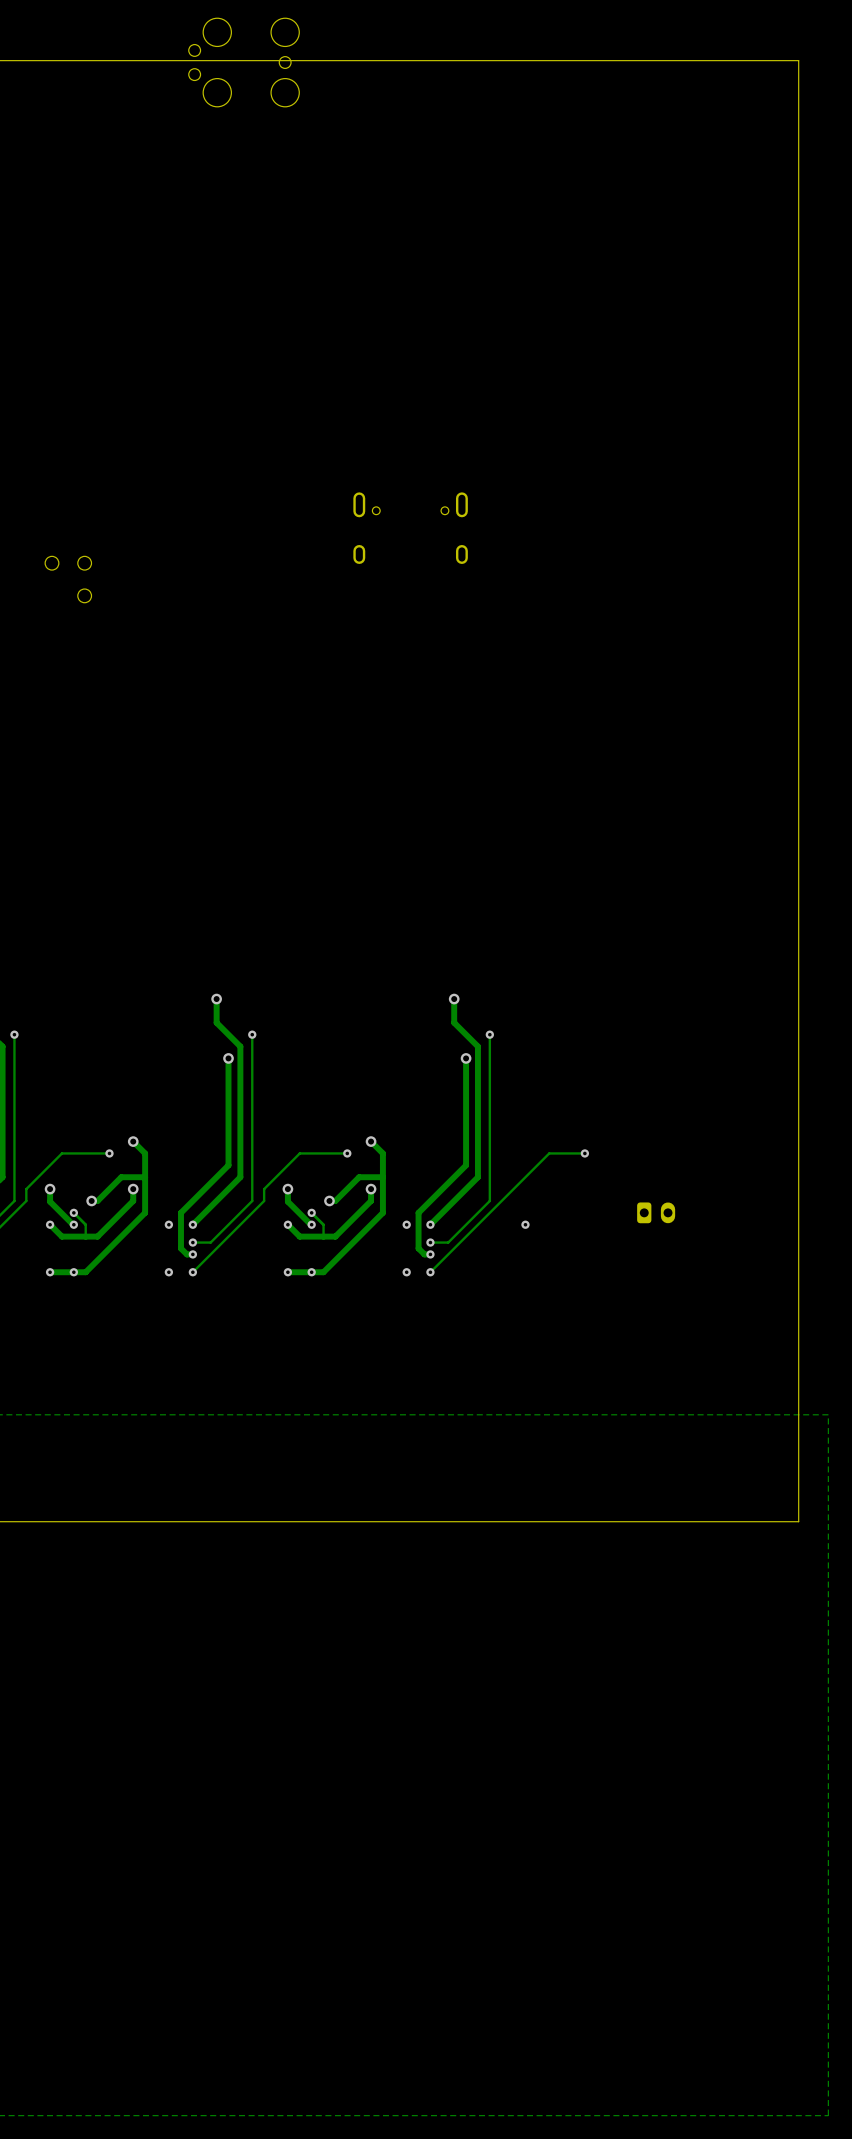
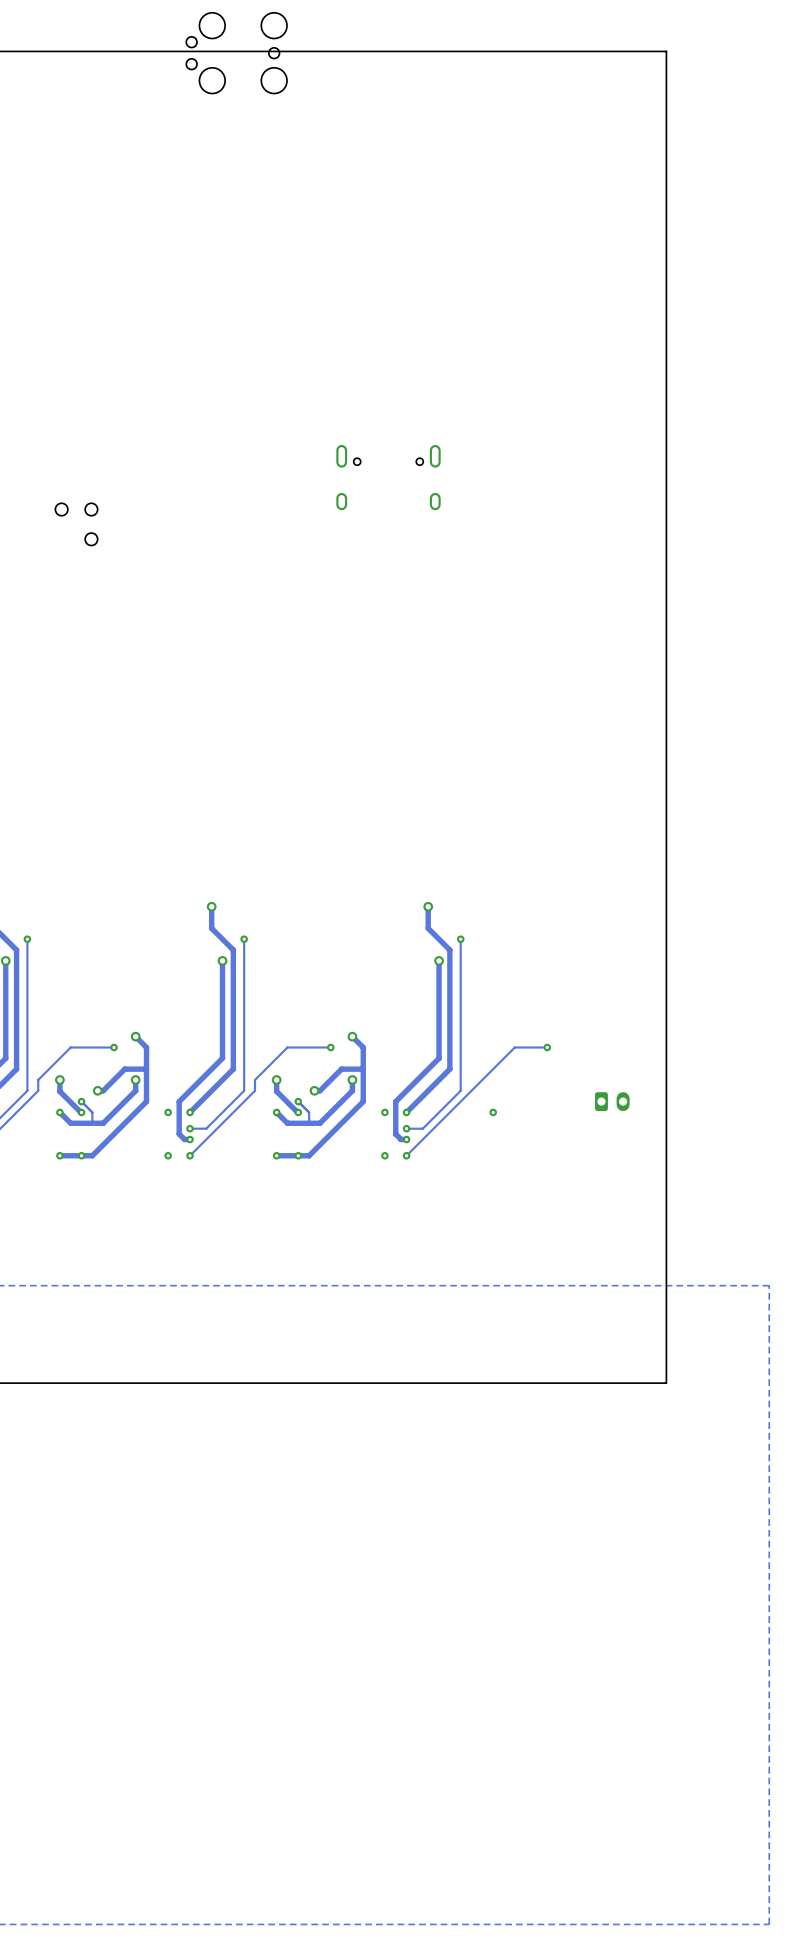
board edge: (715, 60) (798, 60) (798, 1521) (715, 1521) -> (666, 51) (666, 1383)

